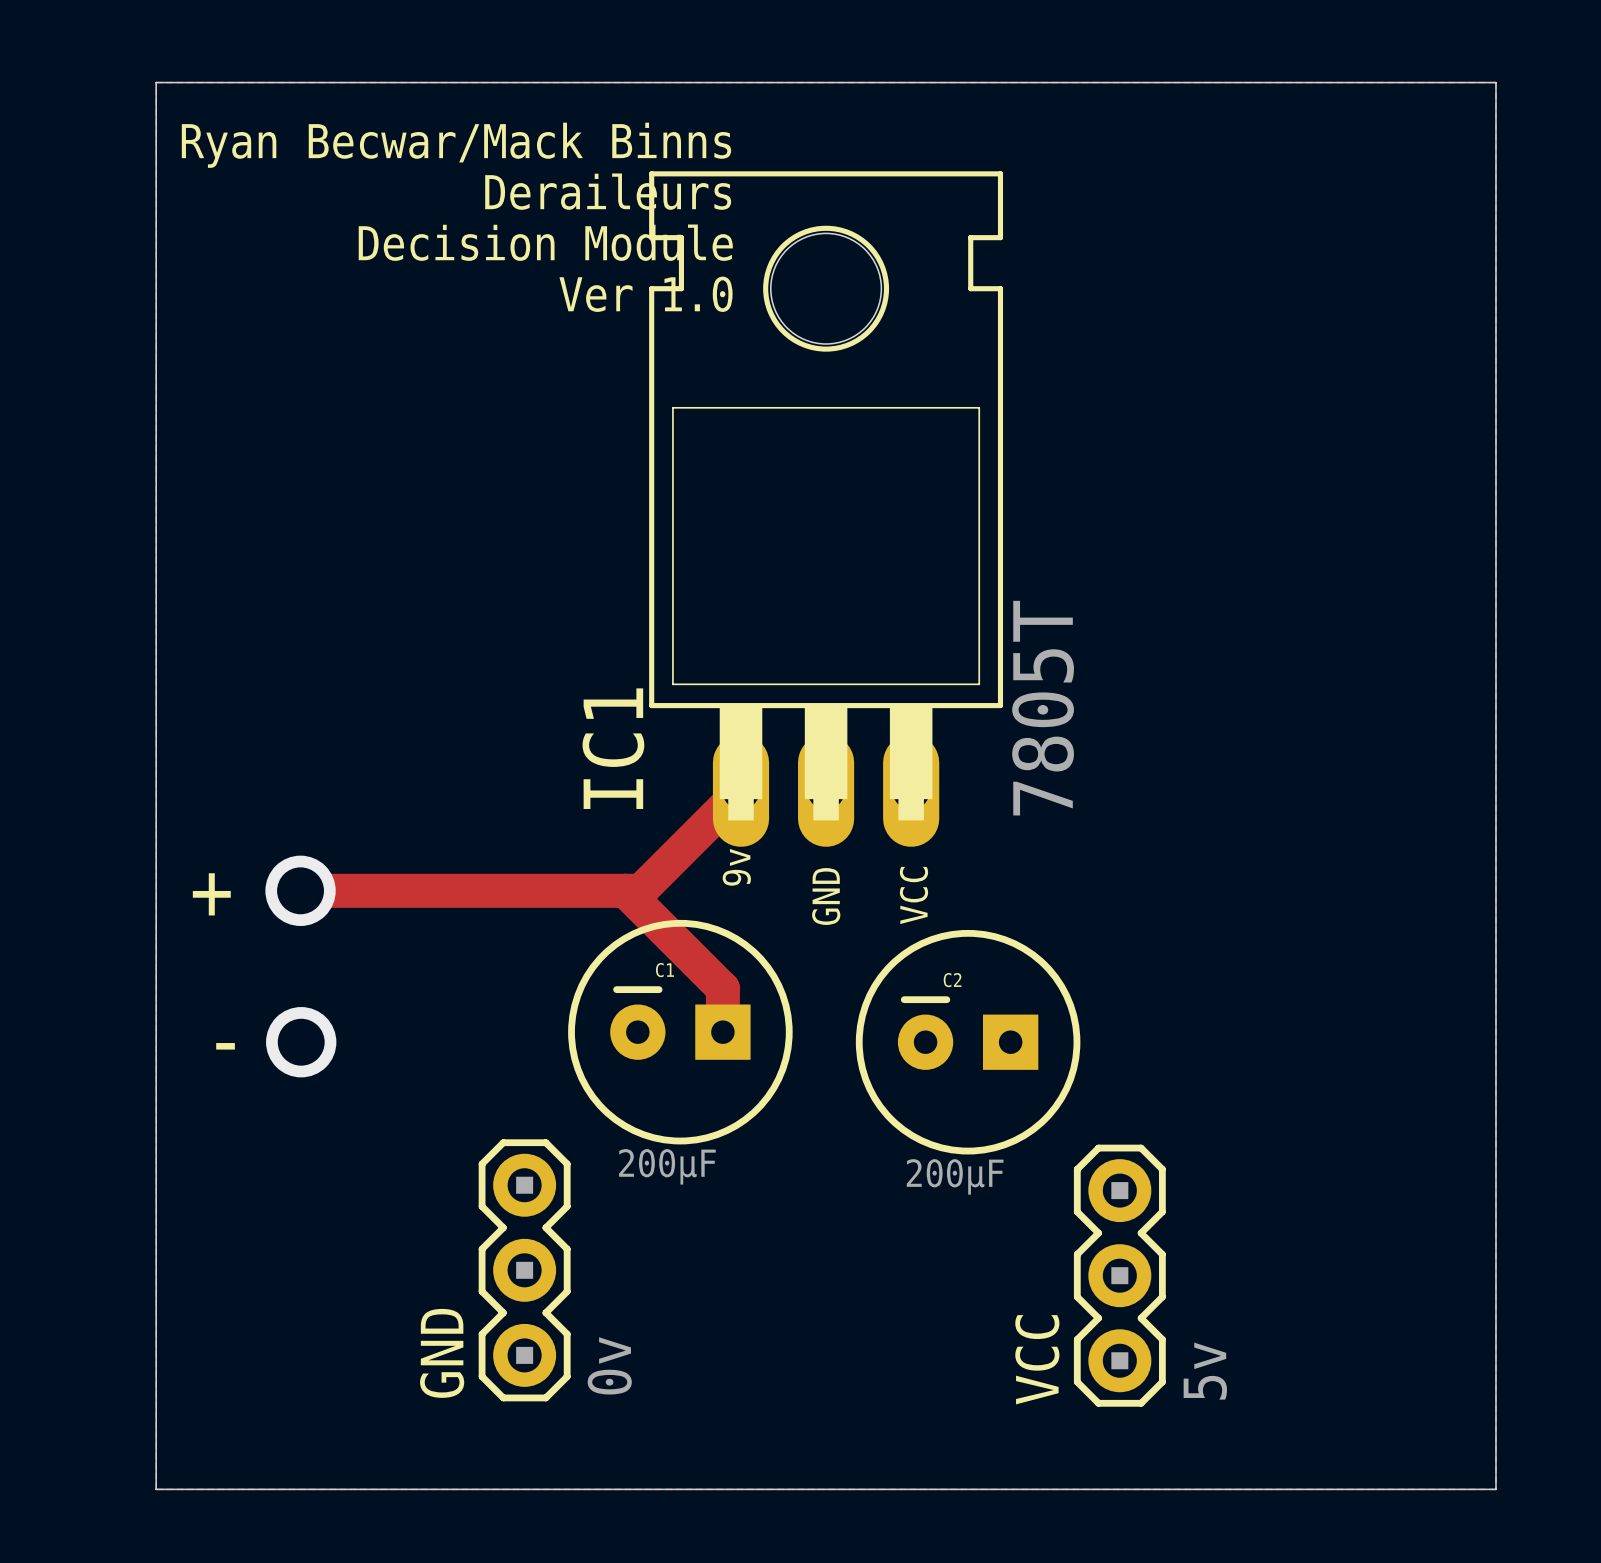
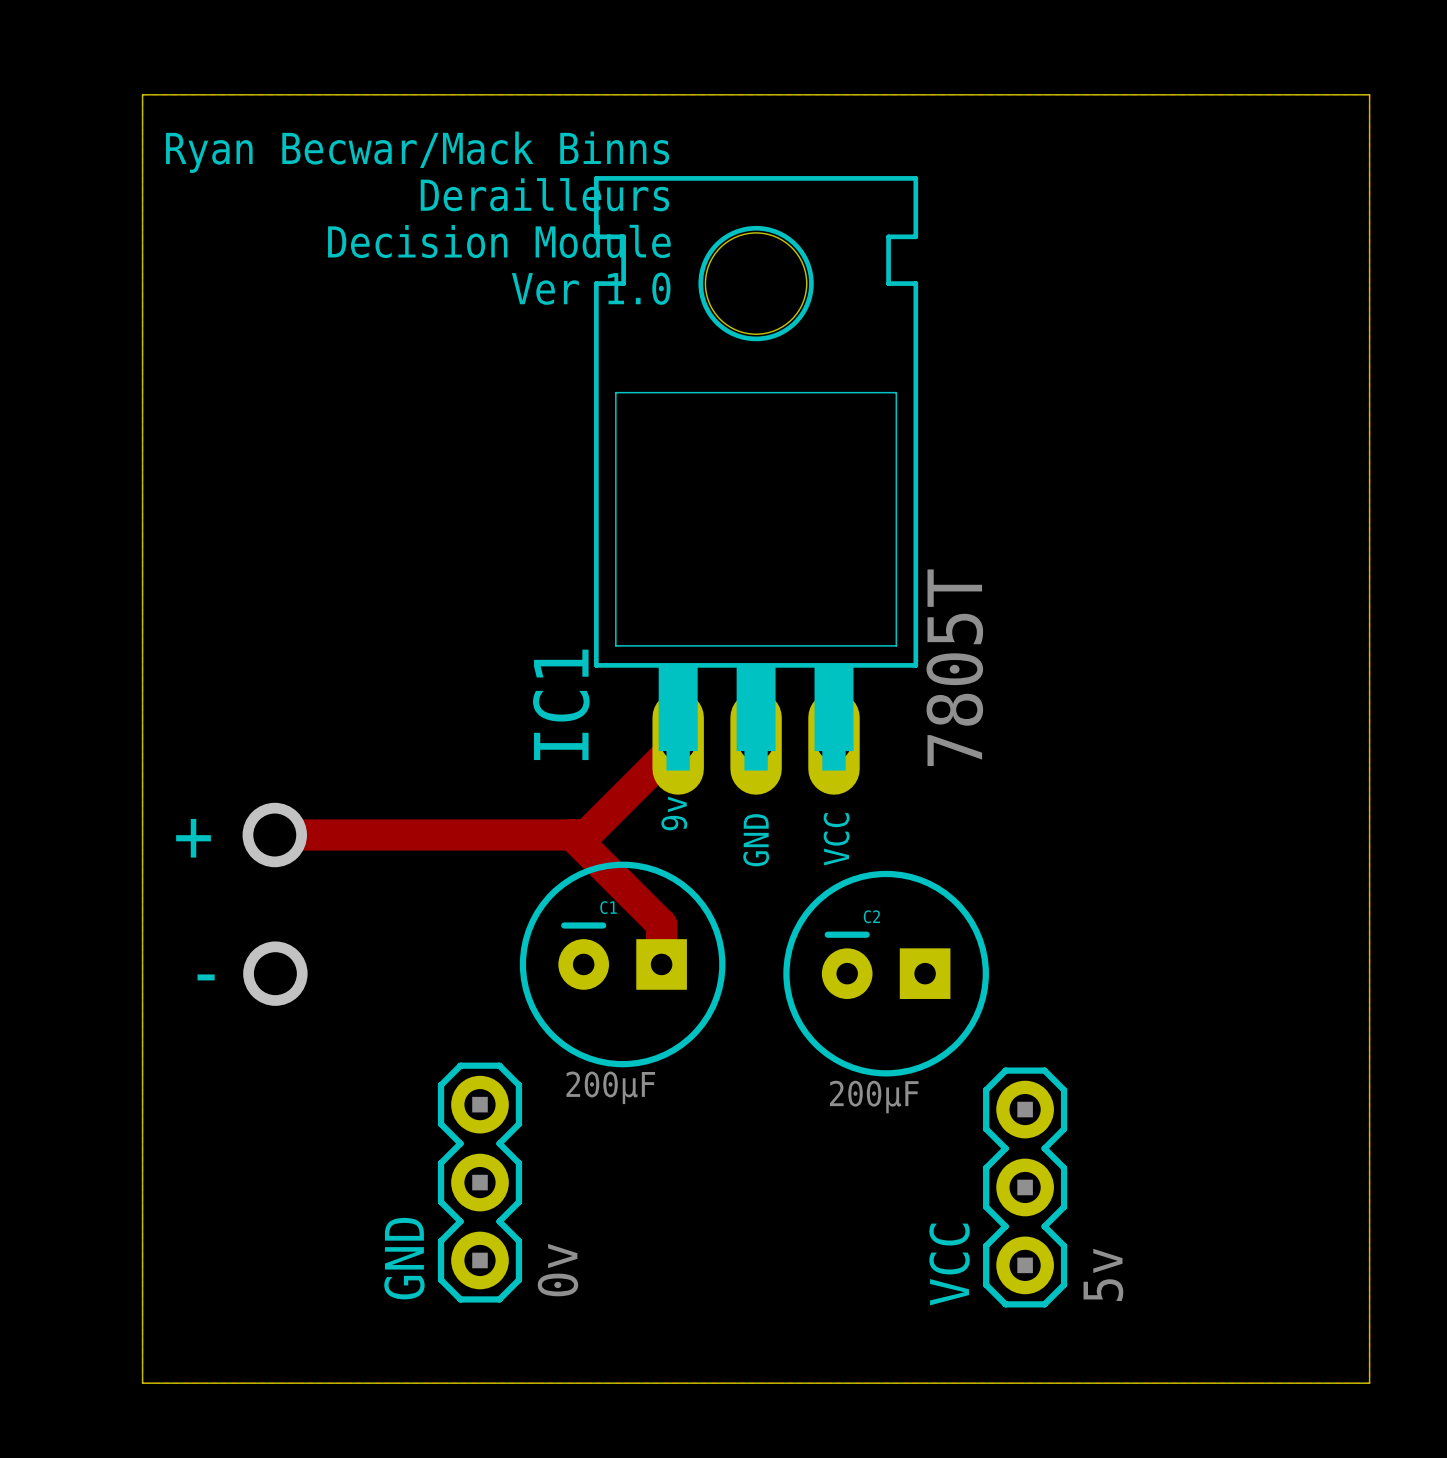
text: Deraileurs (608, 191) -> Derailleurs (544, 194)

